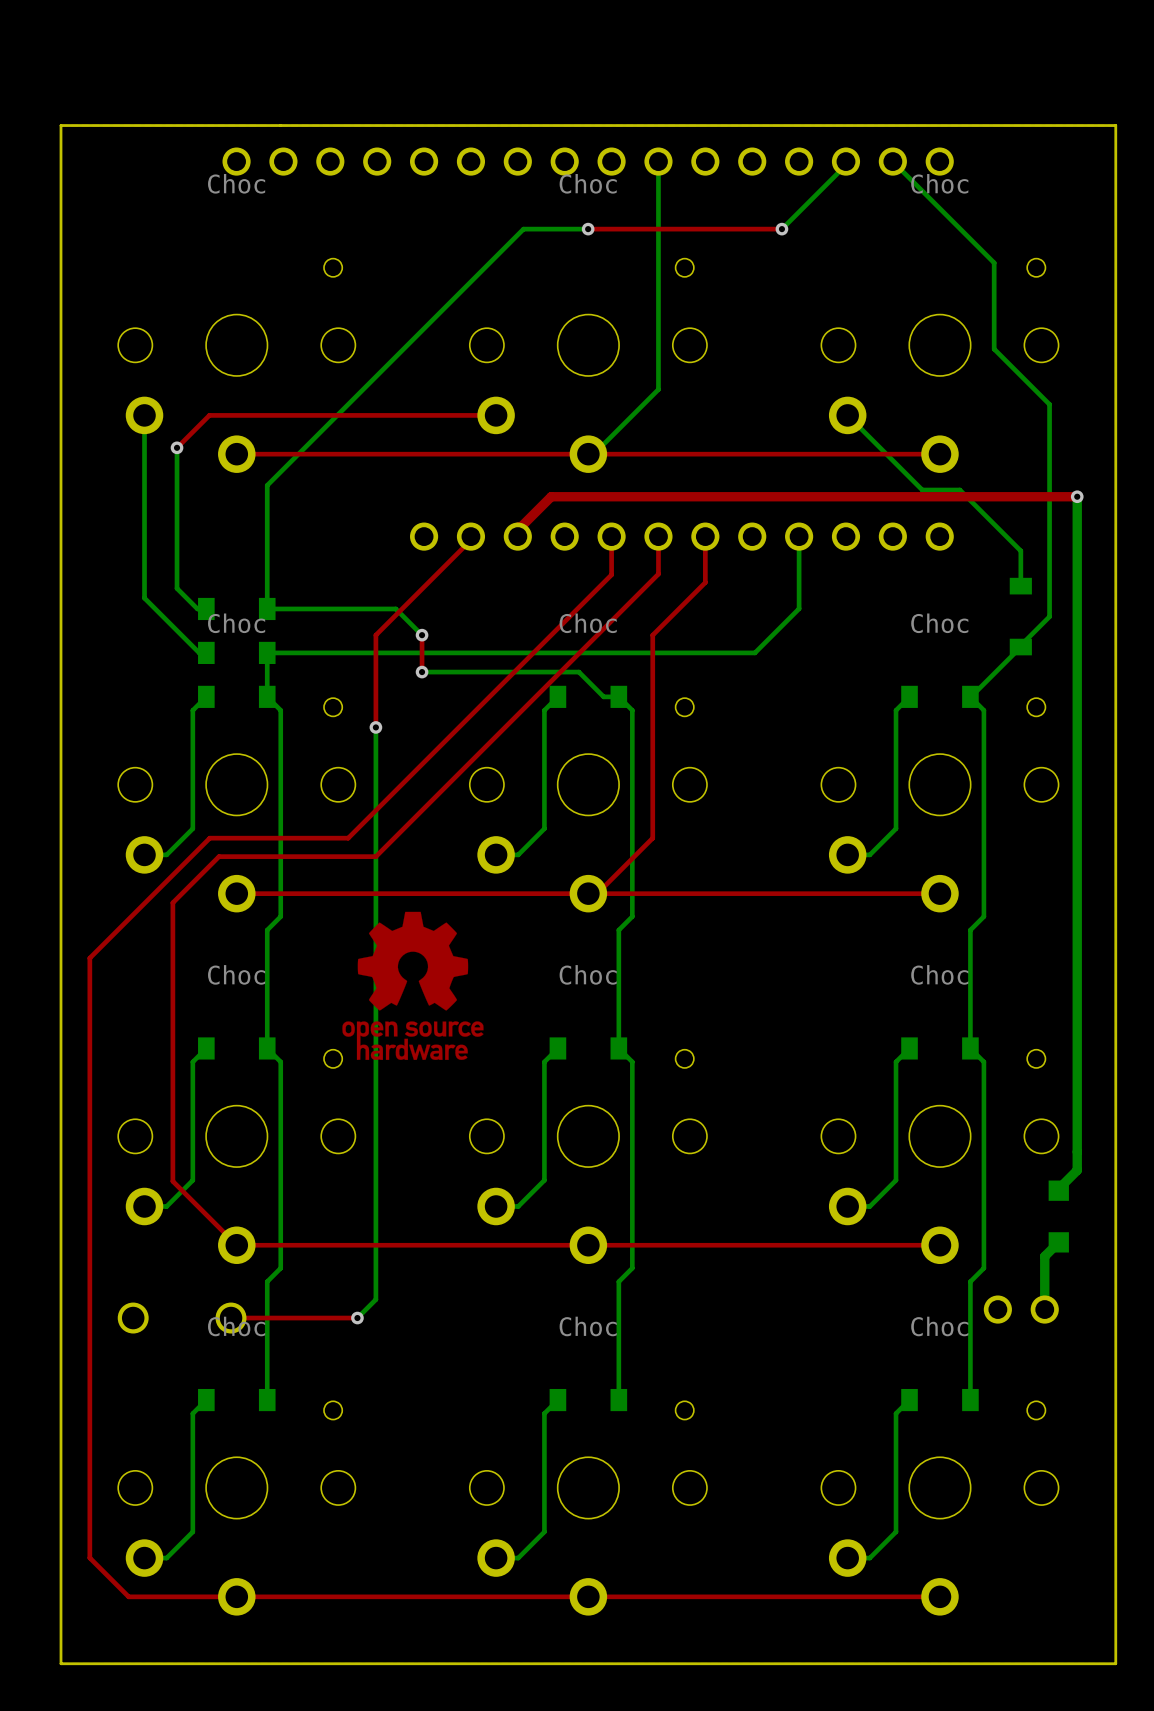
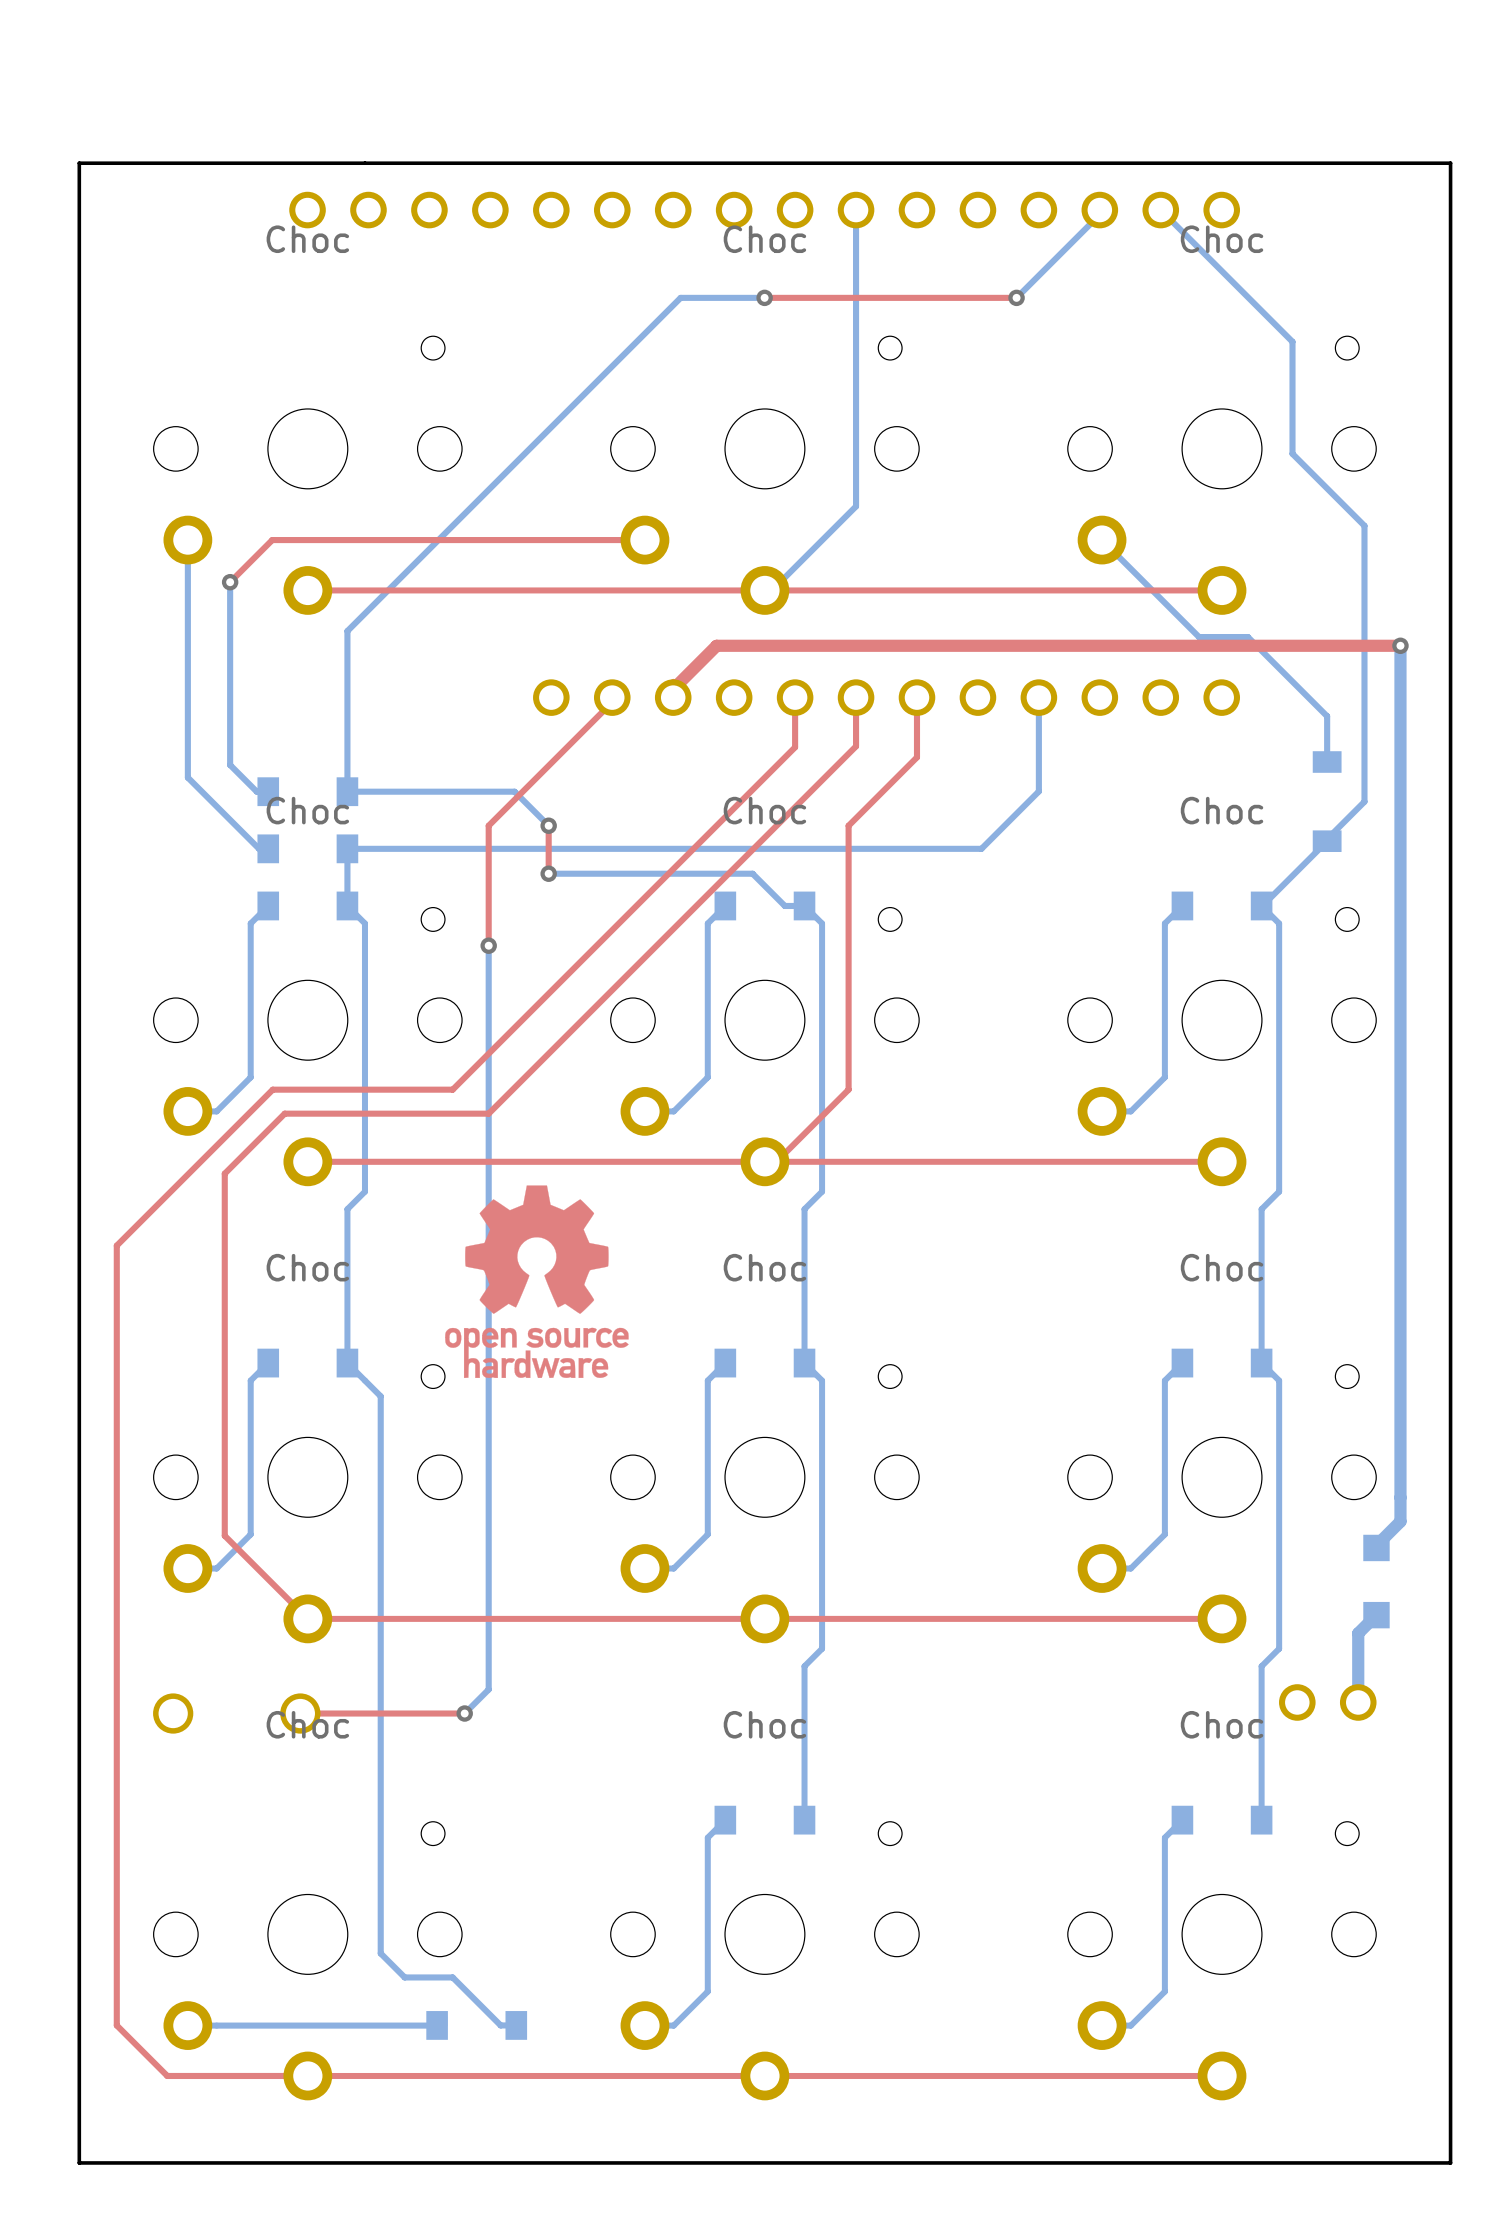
bottom track: (280, 1061) (280, 1268) (267, 1281) (267, 1400) -> (364, 1380) (380, 1396) (380, 1953) (404, 1977) (452, 1977) (500, 2025) (516, 2025)
bottom track: (206, 1400) (192, 1413) (192, 1531) (166, 1558) -> (436, 2025) (216, 2025)
part position: (236, 1400) -> (476, 2025)

